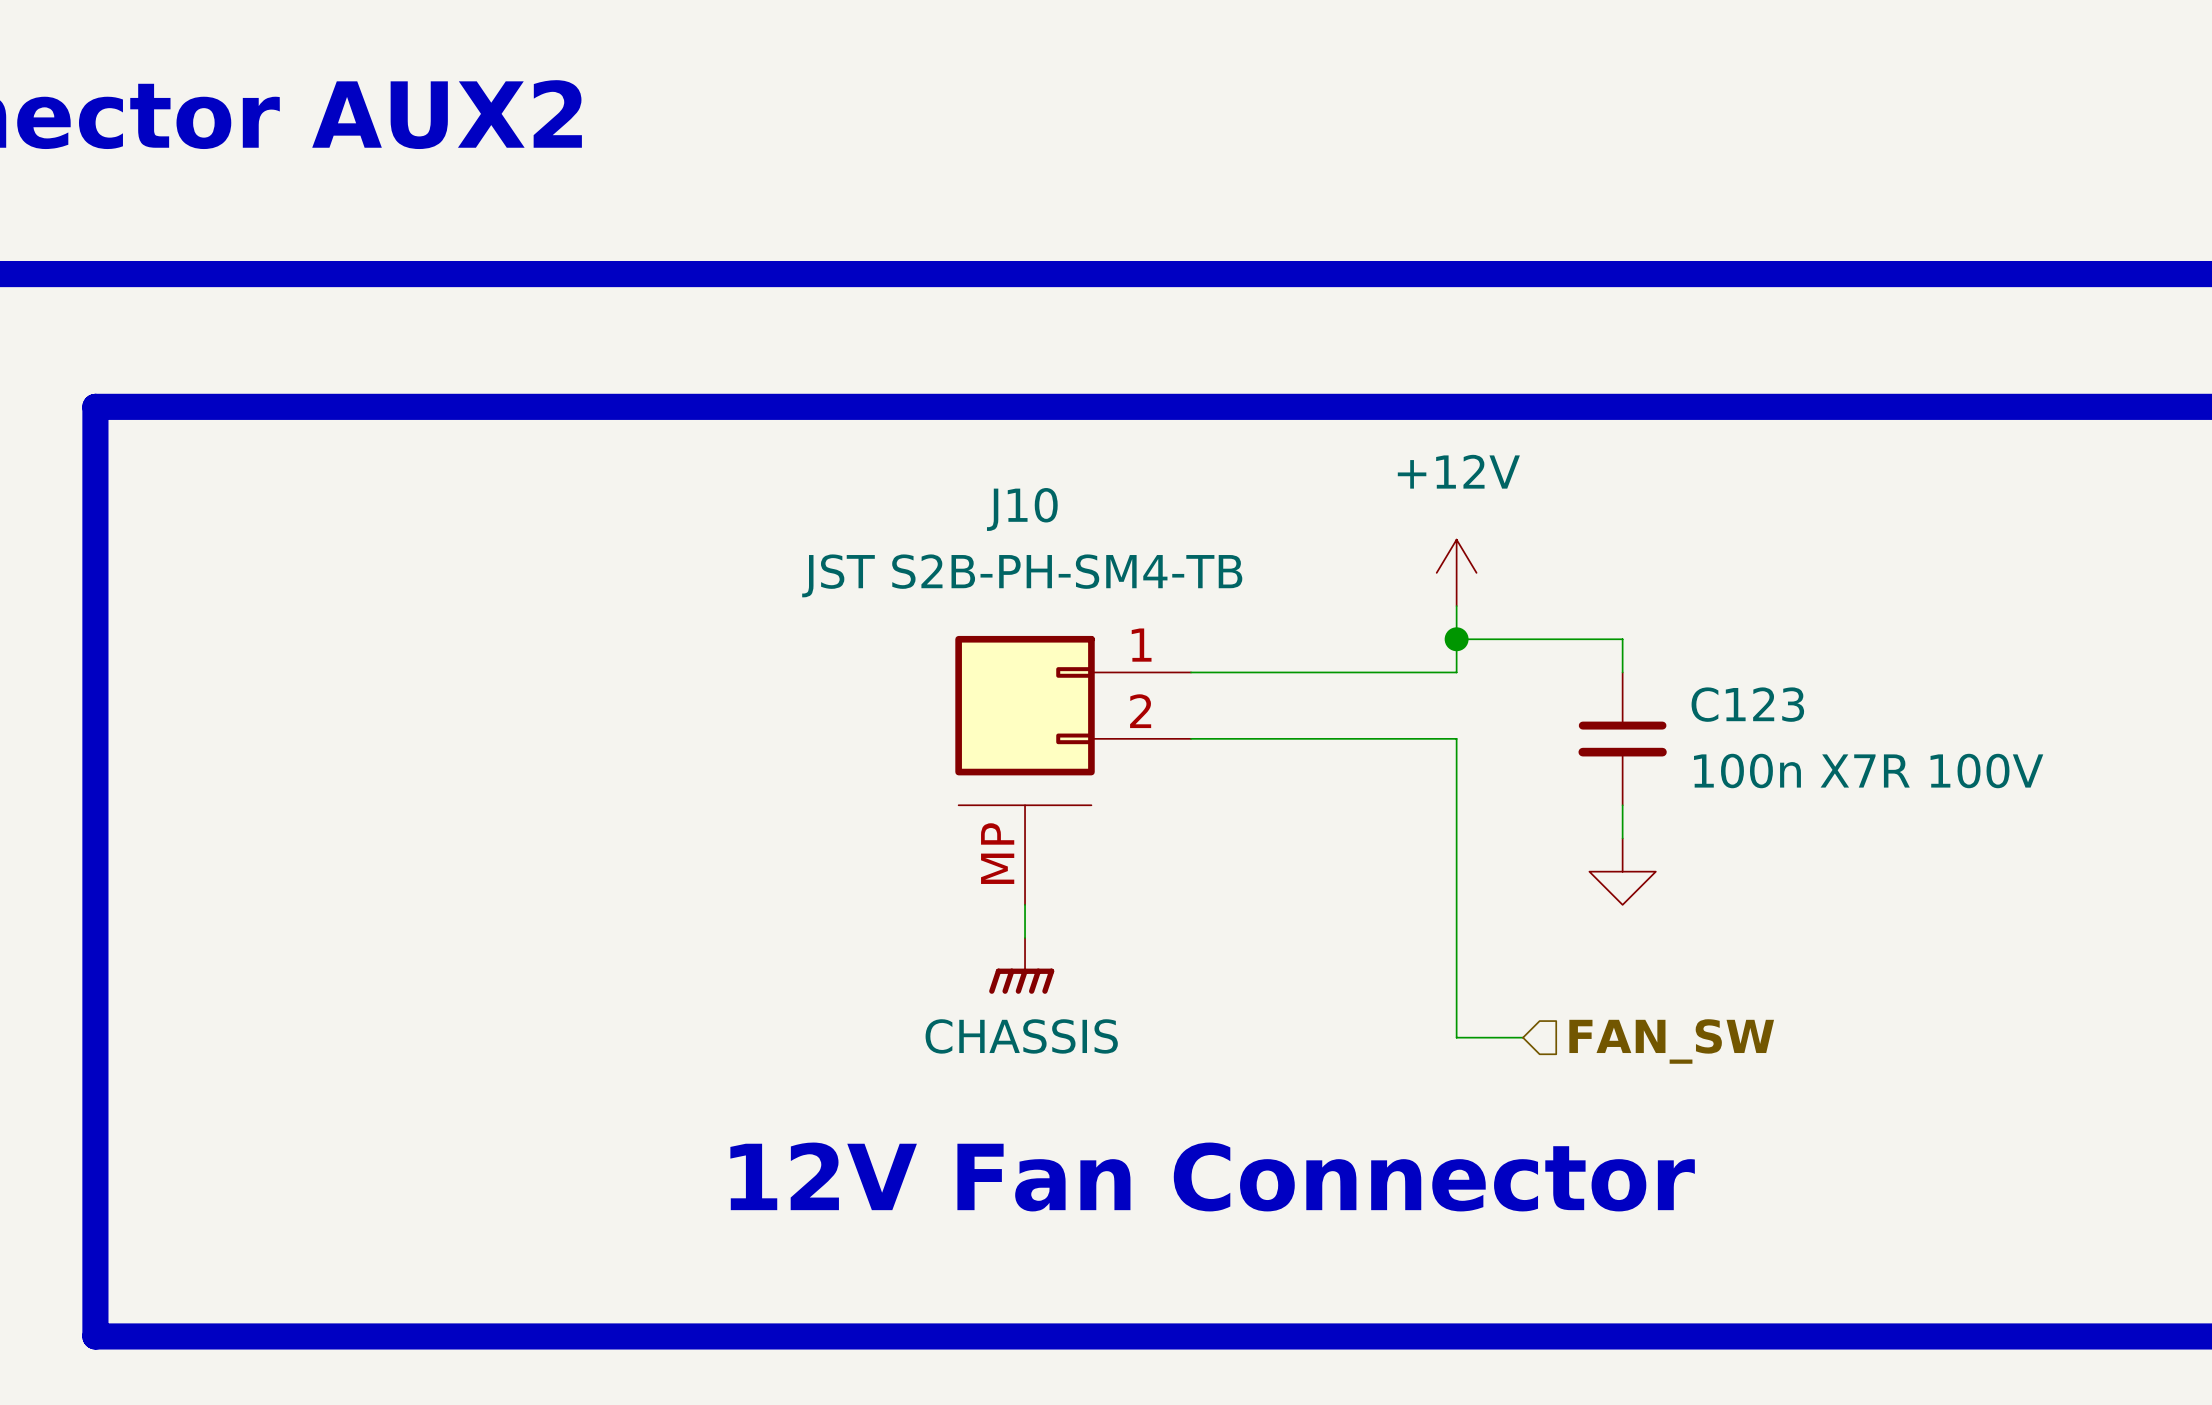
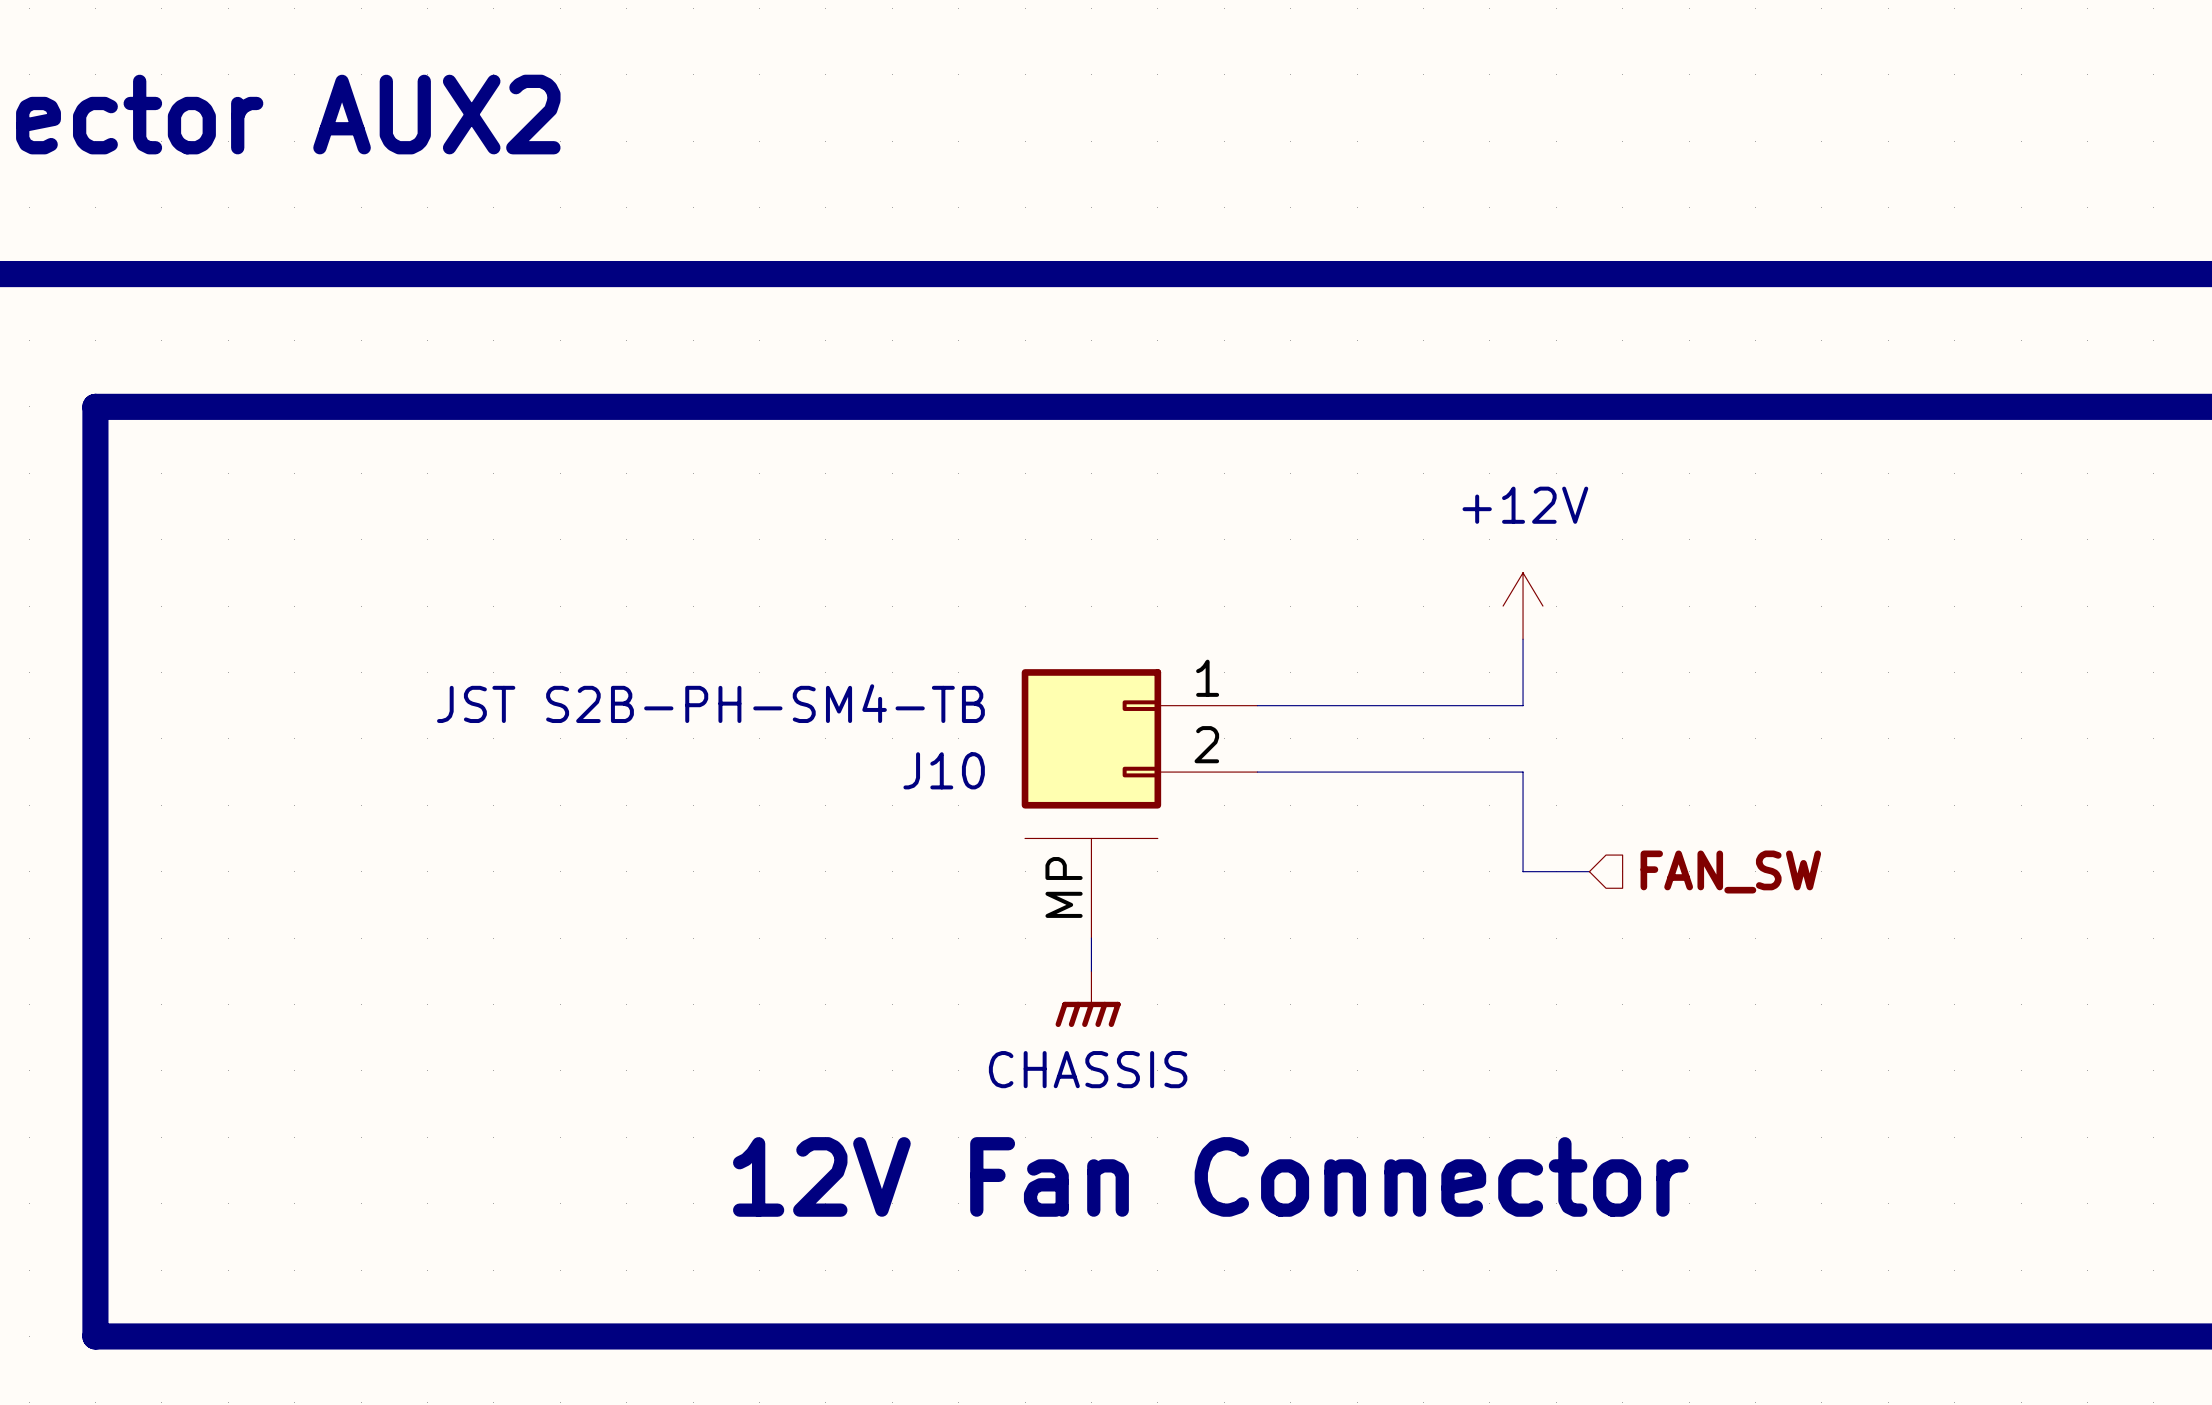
J10 name position: J10 (1022, 509) -> J10 (944, 770)
power symbol position: +12V (1456, 572) -> +12V (1523, 606)
J10 value position: JST S2B-PH-SM4-TB (1022, 575) -> JST S2B-PH-SM4-TB (710, 703)
wire: (1456, 606) (1456, 672) (1191, 672) -> (1523, 639) (1523, 705) (1257, 705)
wire: (1456, 639) (1622, 639) (1622, 672) -> none
junction: (1456, 639) -> none
wire: (1191, 738) (1456, 738) (1456, 1037) (1523, 1037) -> none
C123: 100n X7R 100V (1622, 738) -> none
J10 position: (1073, 770) -> (1139, 803)
wire: none -> (1257, 772) (1523, 772) (1523, 871) (1589, 871)
wire: (1622, 805) (1622, 838) -> none
power symbol: (1622, 871) -> none
wire: (1025, 904) (1025, 938) -> (1091, 938) (1091, 971)
power symbol position: CHASSIS (1021, 965) -> CHASSIS (1088, 999)
hierarchical label position: FAN_SW (1671, 1041) -> FAN_SW (1730, 872)

